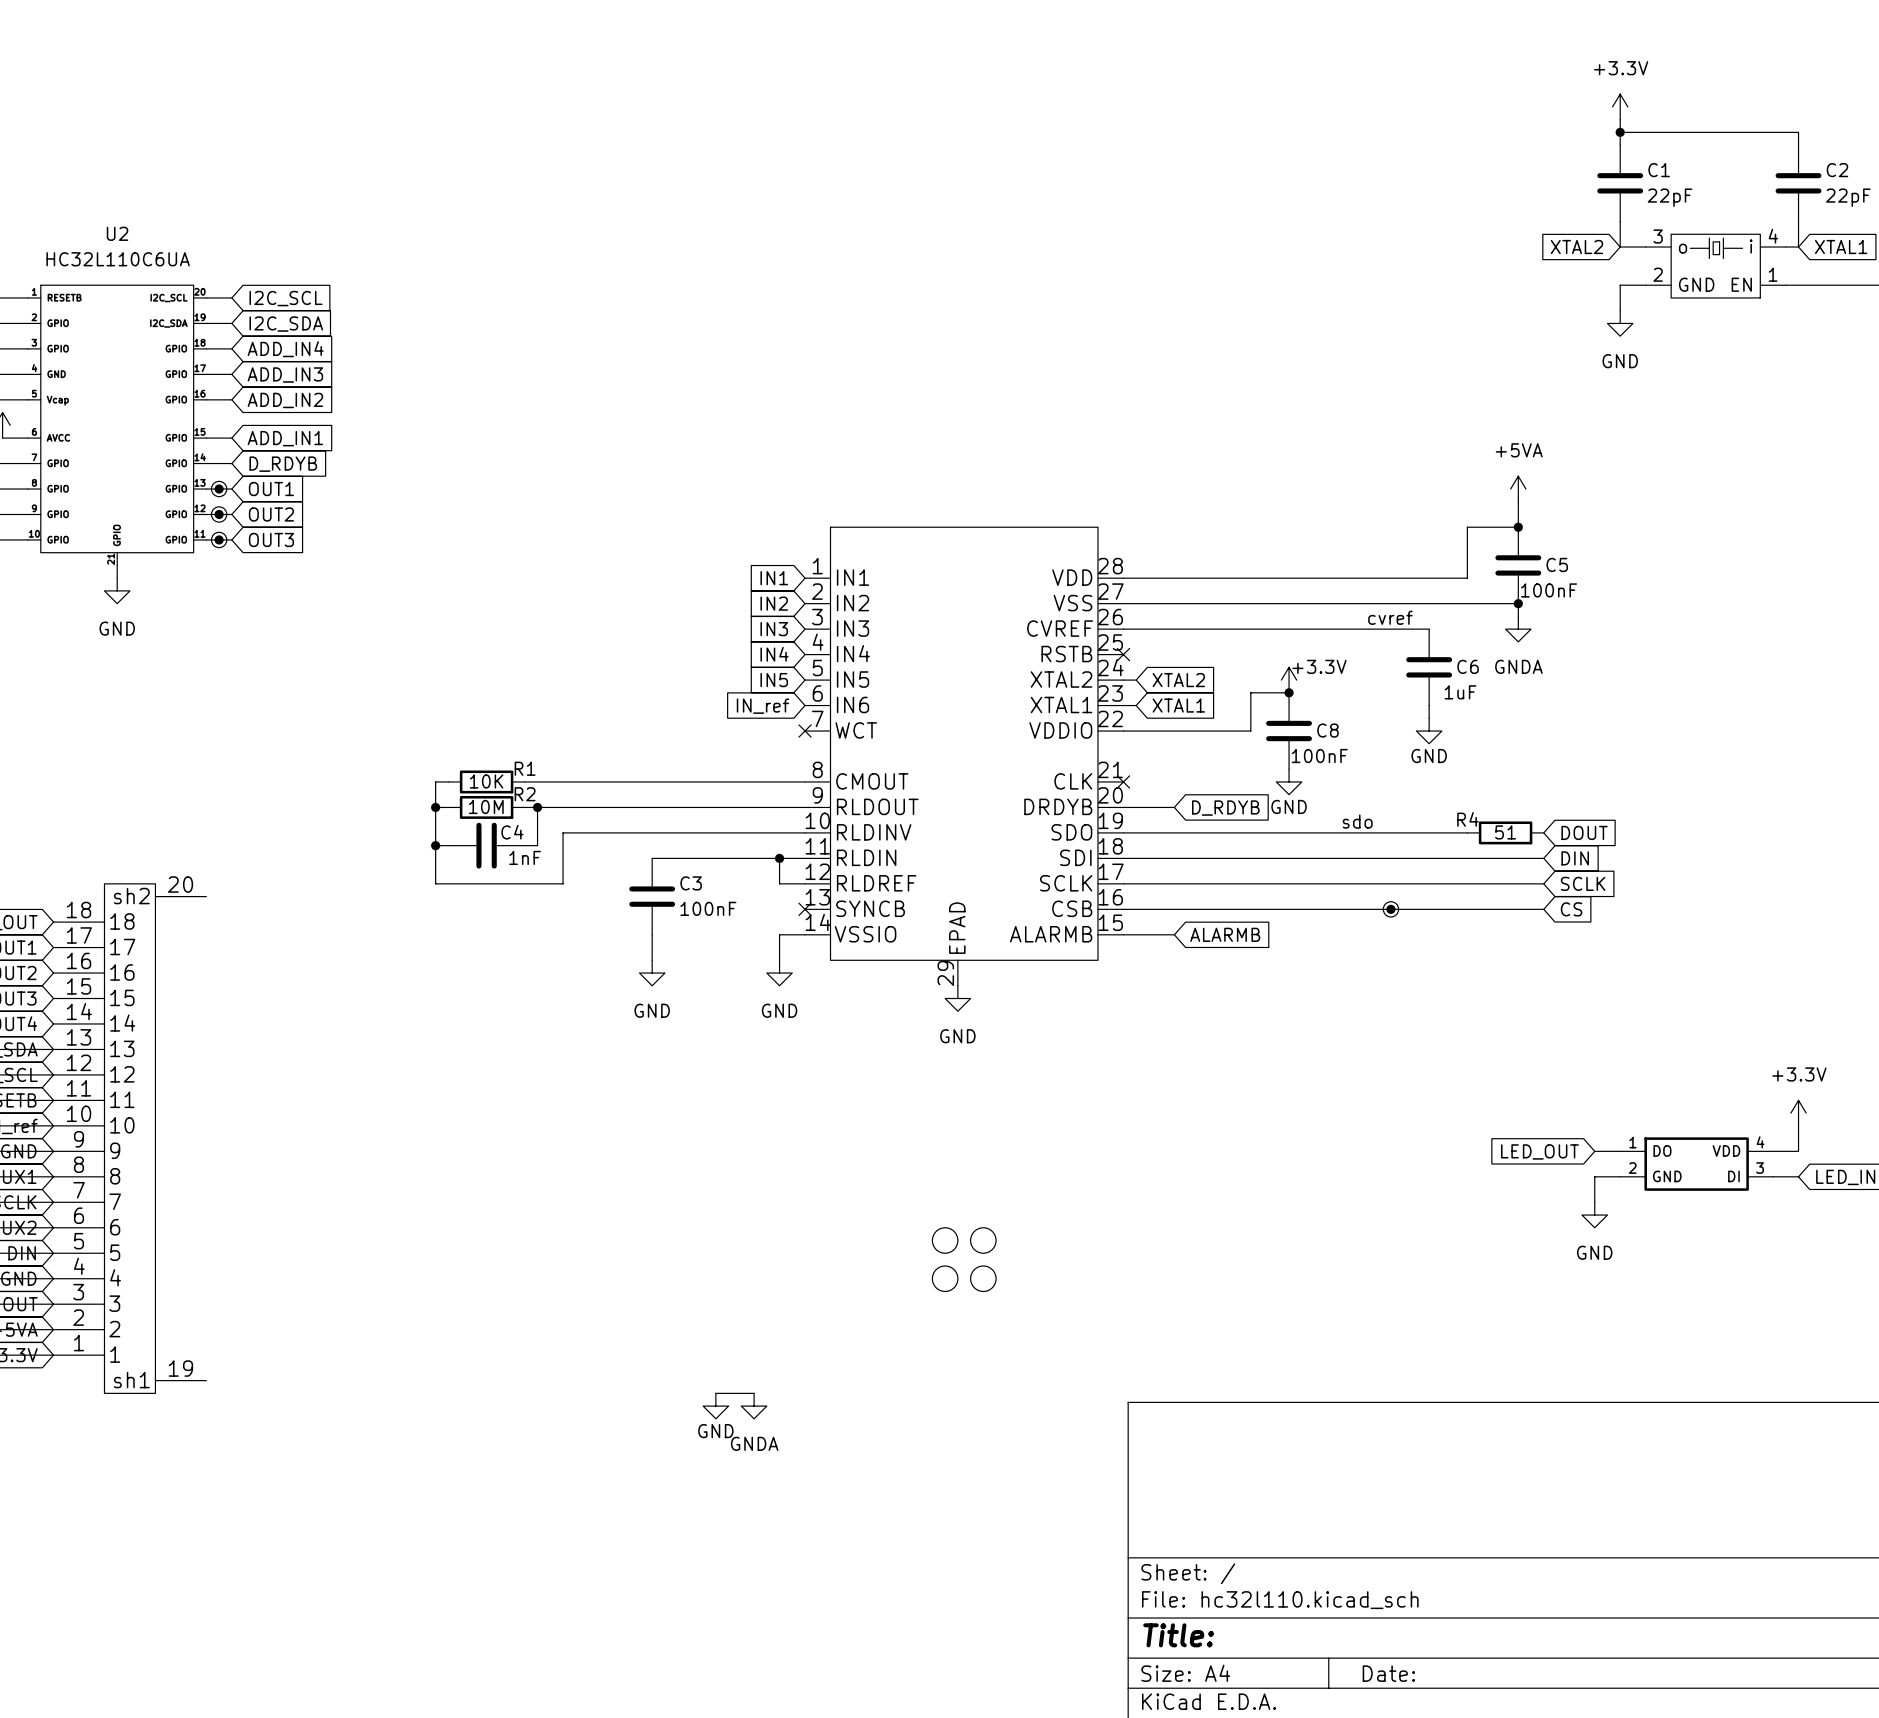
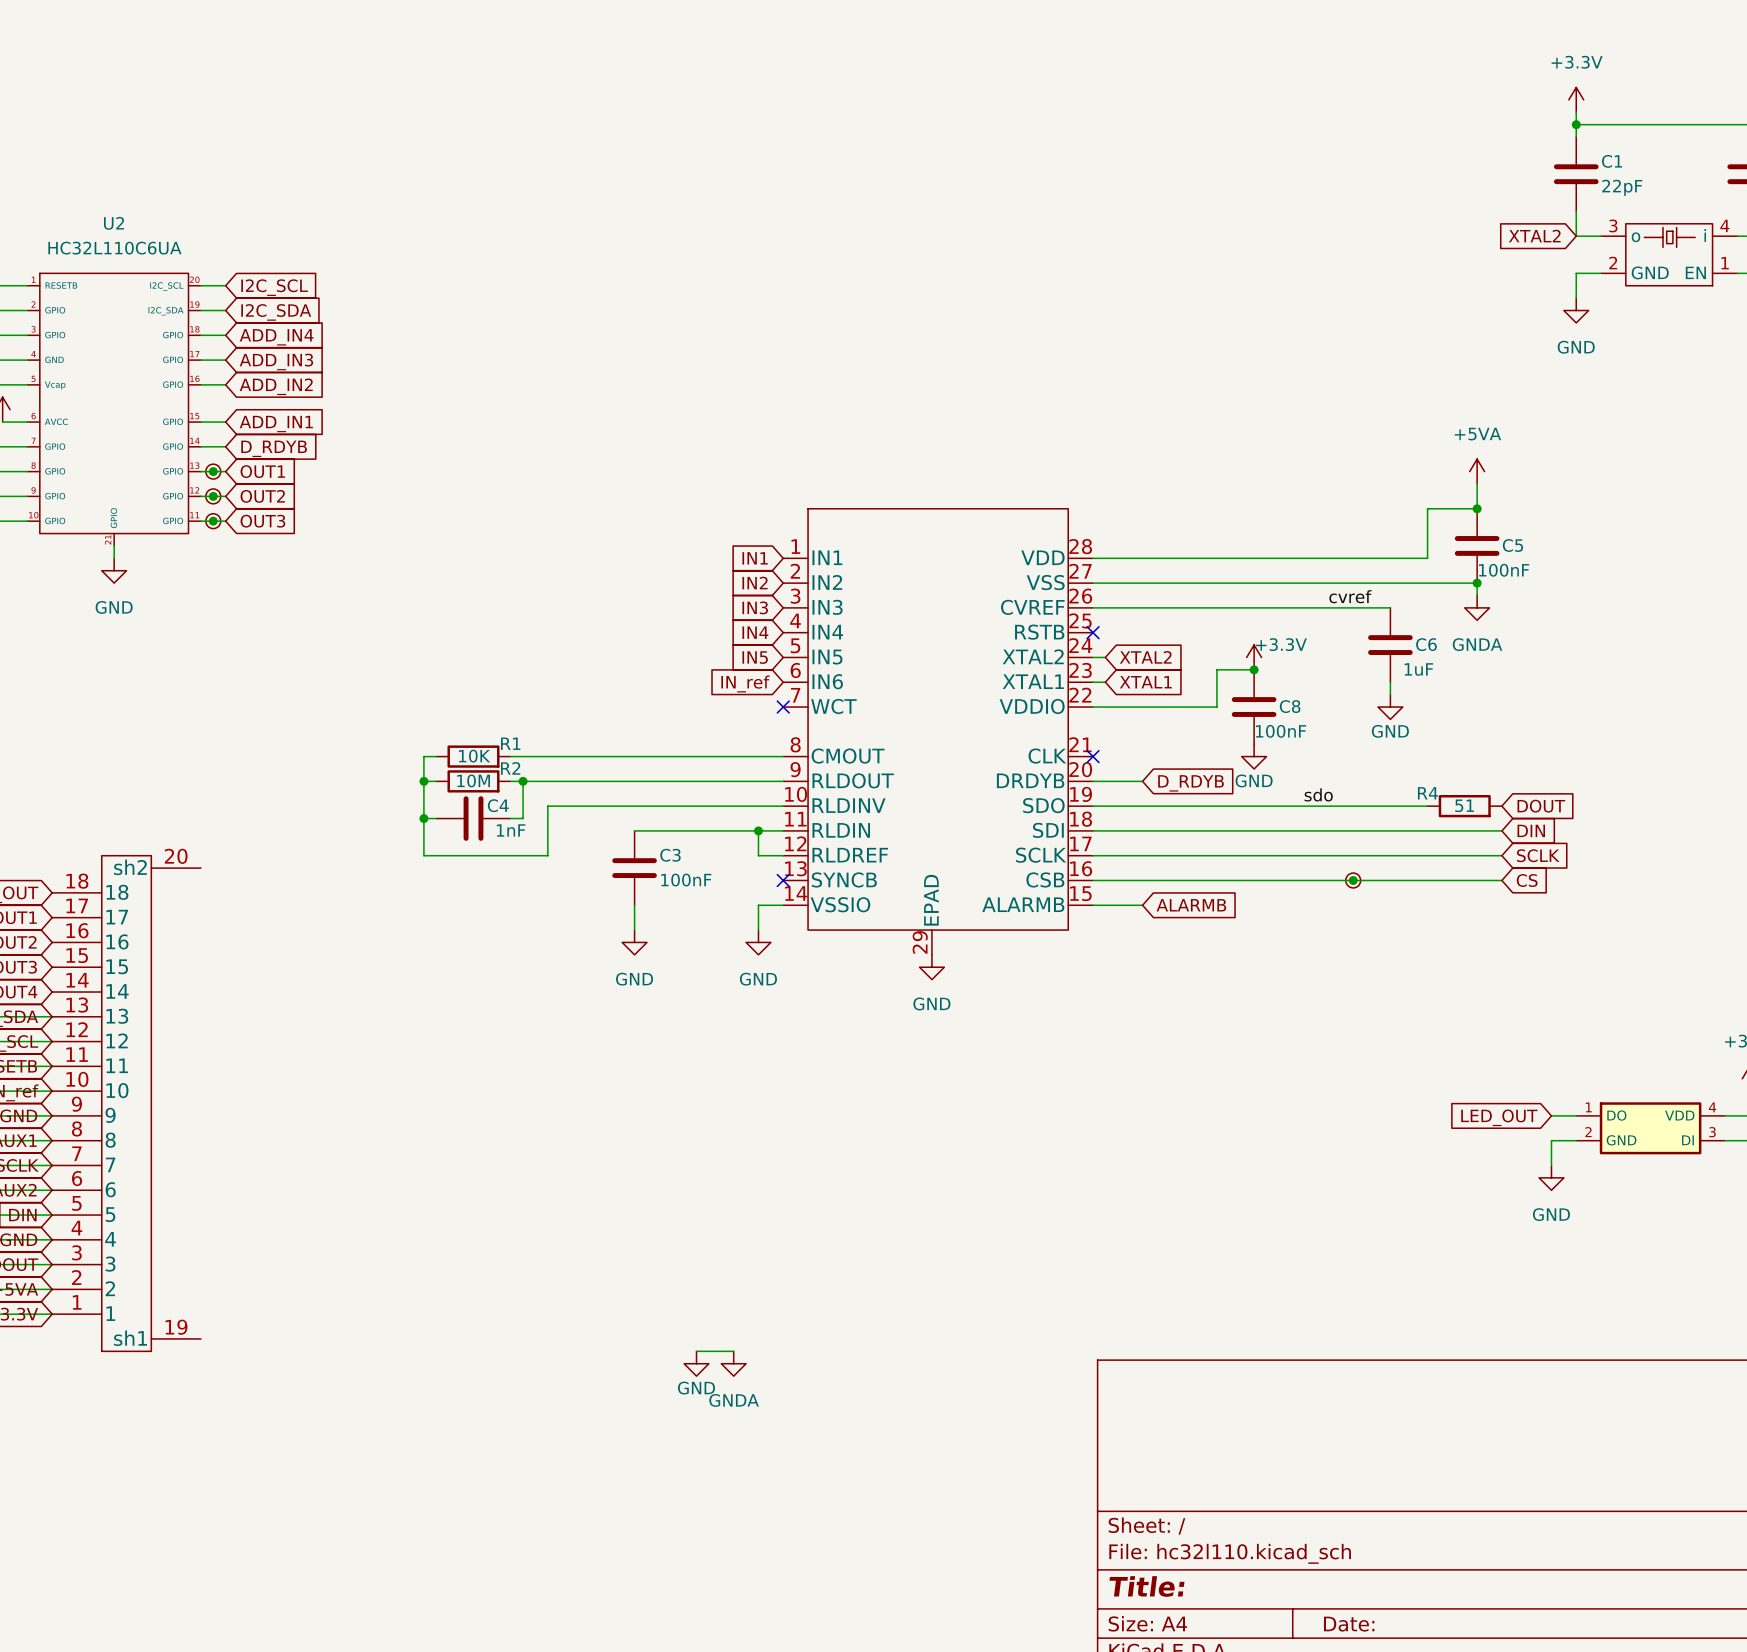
part: (945, 1240) -> none
part: (983, 1240) -> none
part: (945, 1278) -> none
part: (983, 1278) -> none

